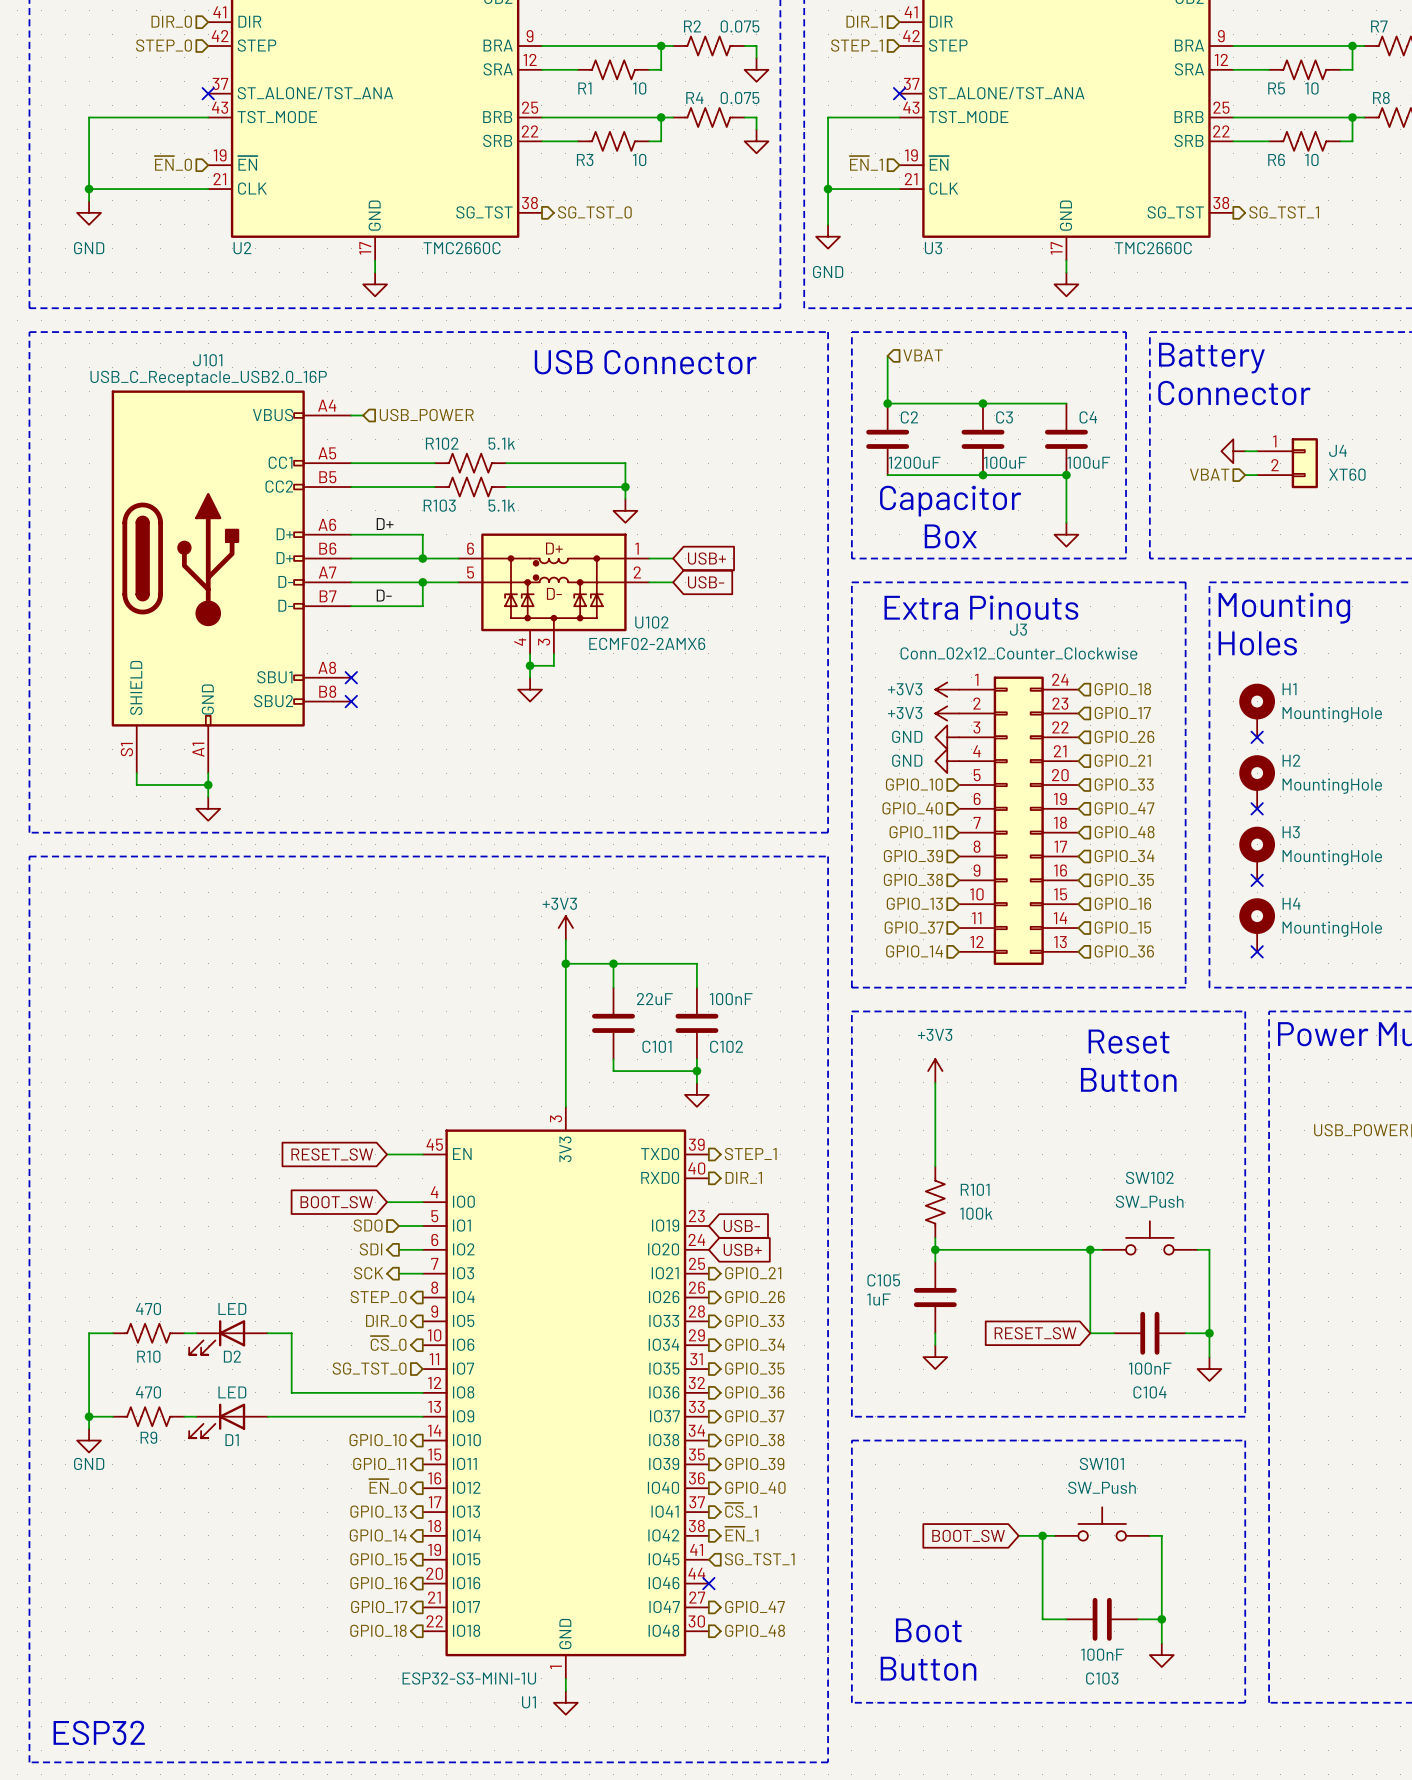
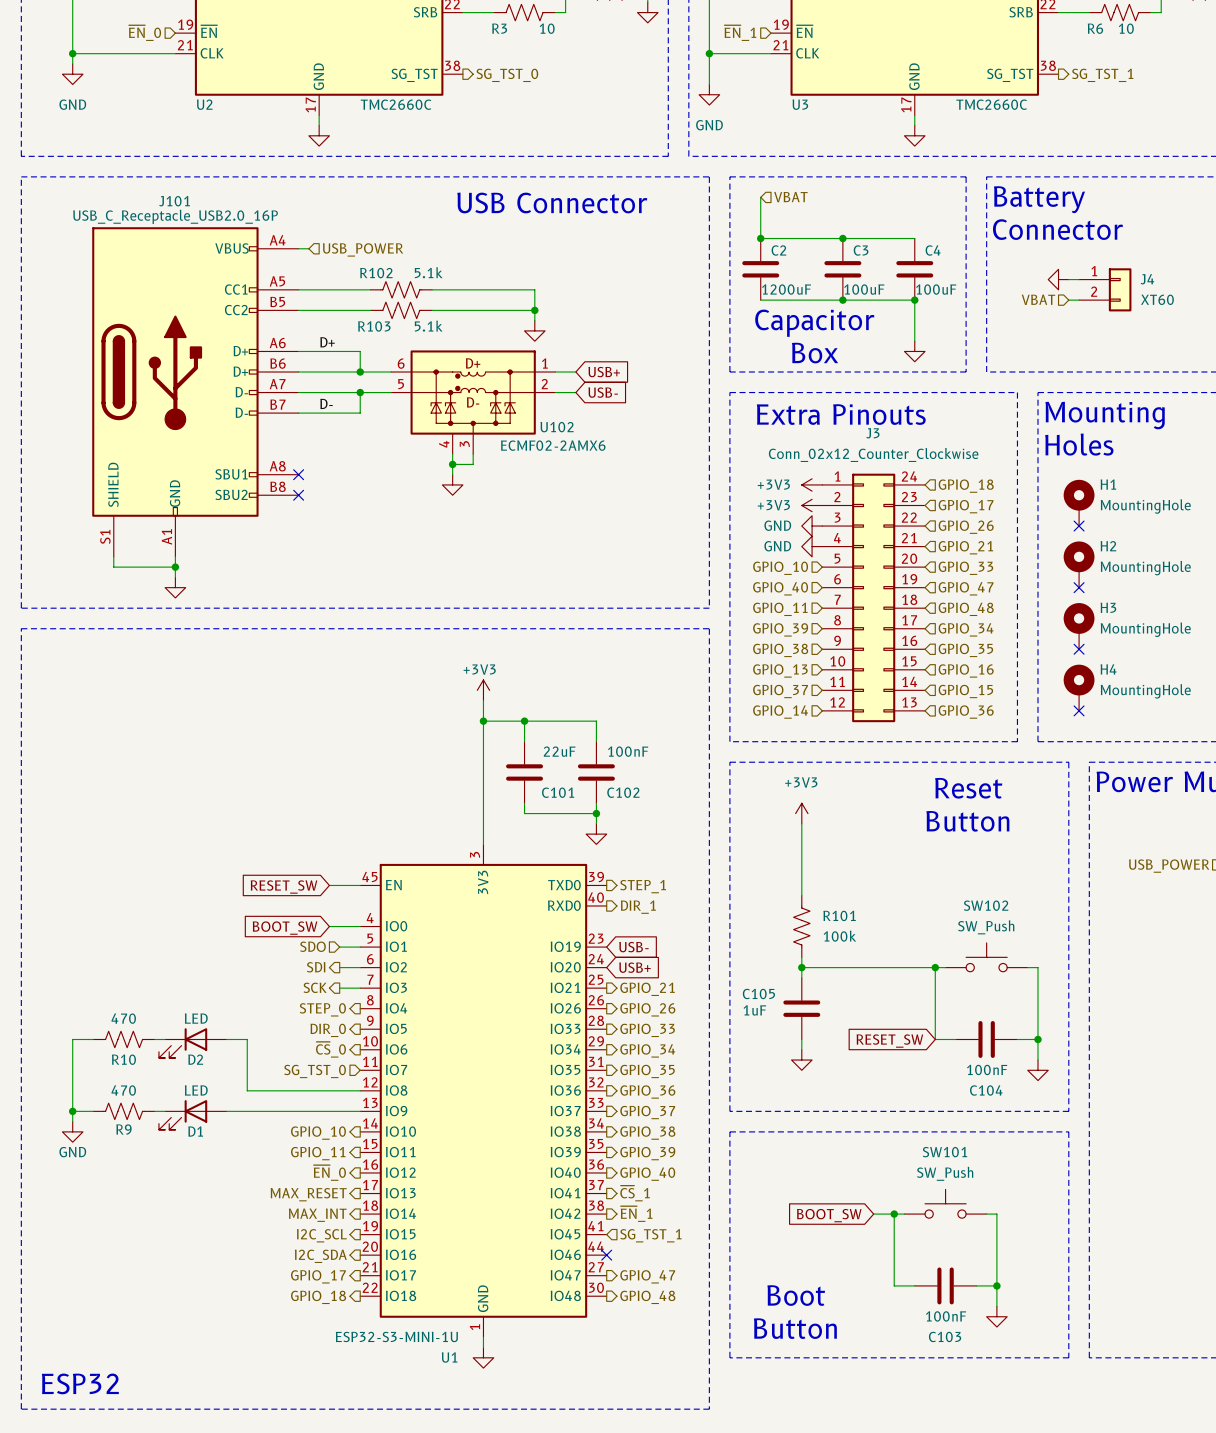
hierarchical label: GPIO_13 (378, 1511) -> MAX_RESET (308, 1194)
hierarchical label: GPIO_14 (378, 1535) -> MAX_INT (317, 1215)
hierarchical label: GPIO_15 (378, 1559) -> I2C_SCL (321, 1235)
hierarchical label: GPIO_16 (378, 1583) -> I2C_SDA (320, 1256)

